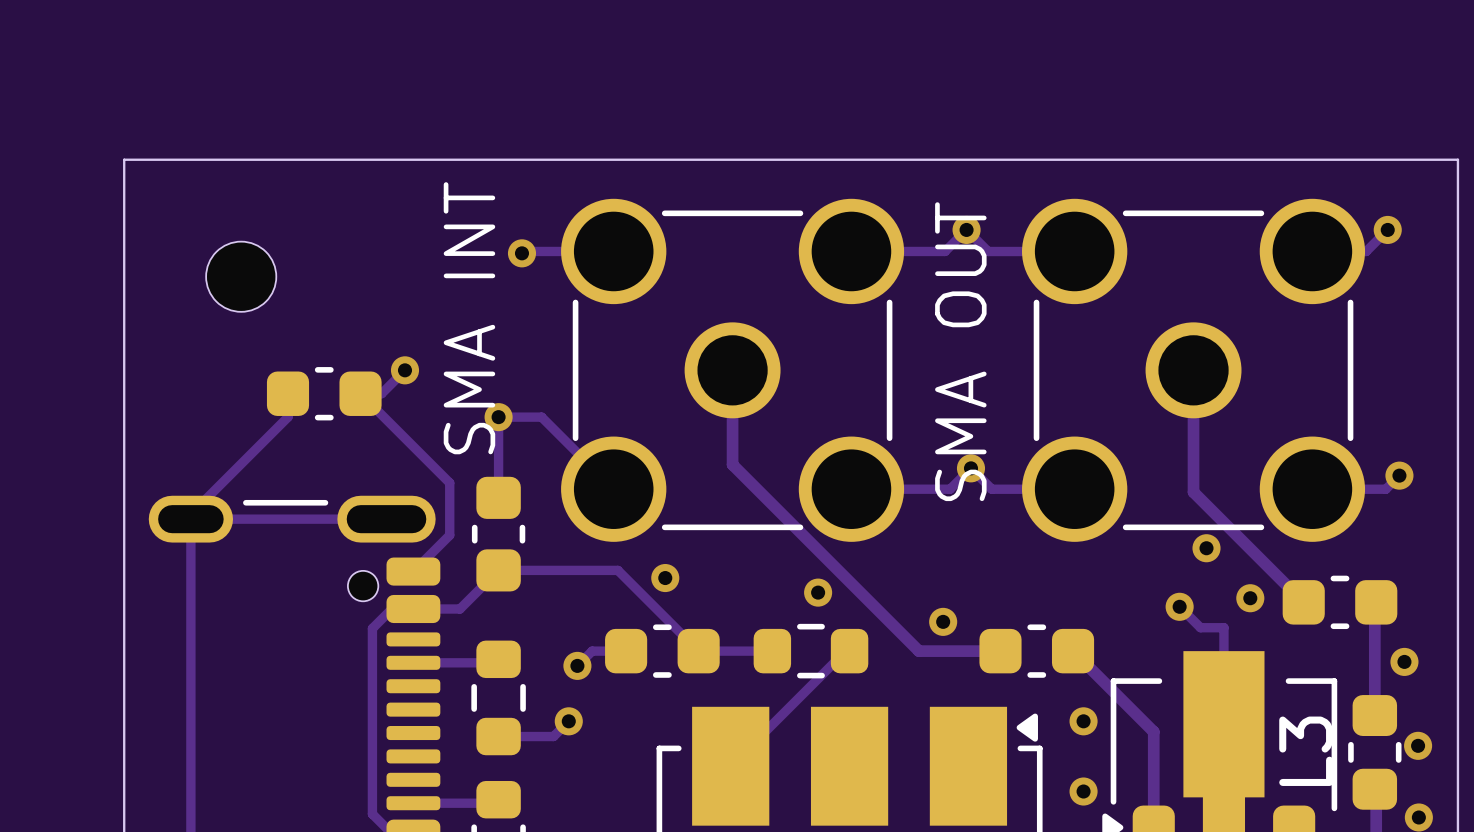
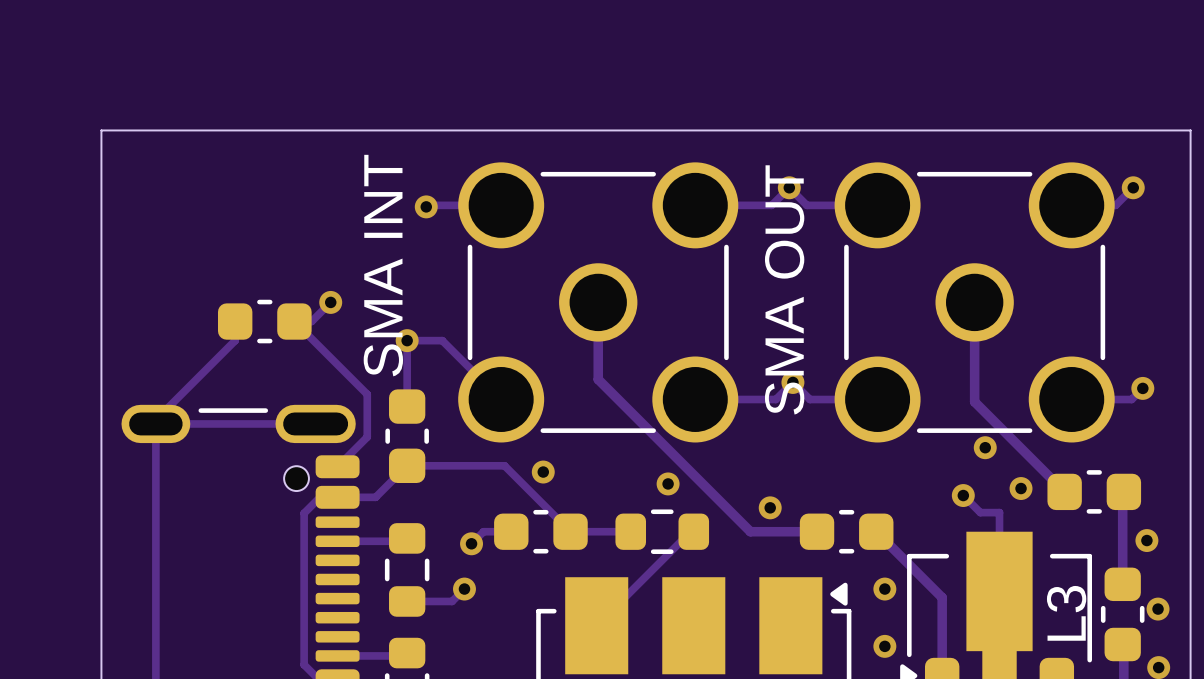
part: (241, 276) -> none

